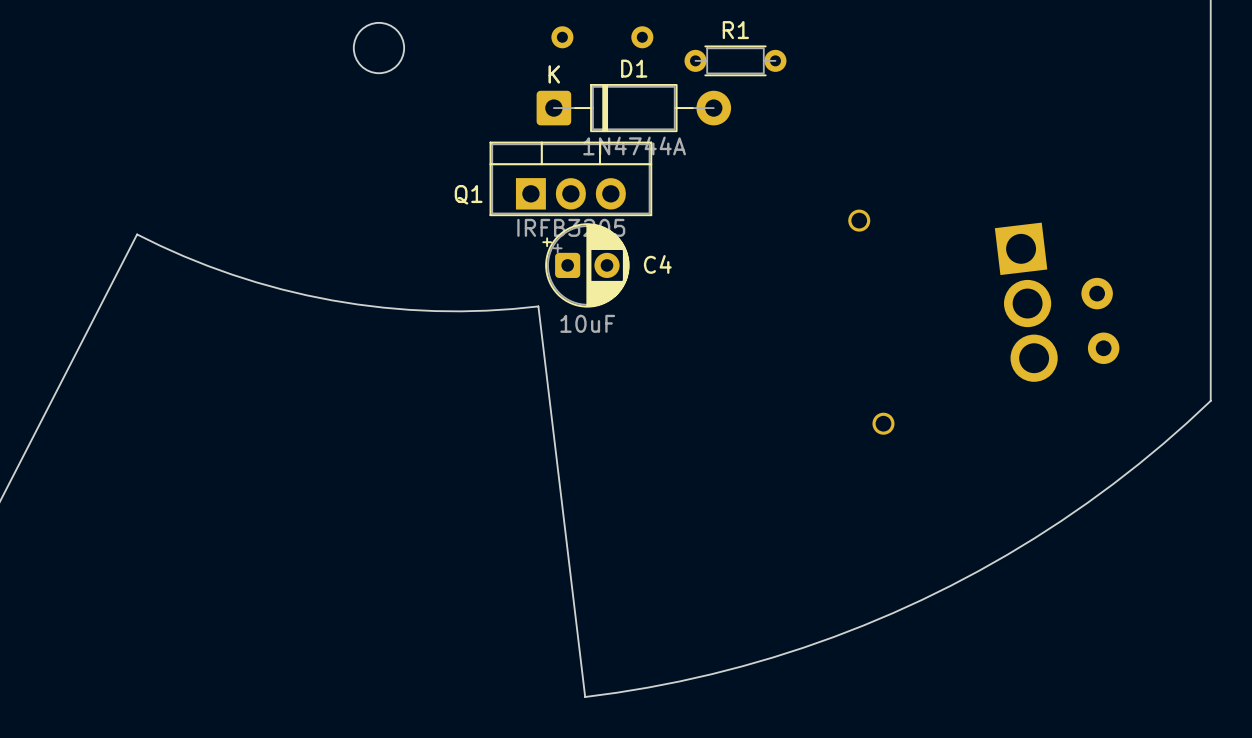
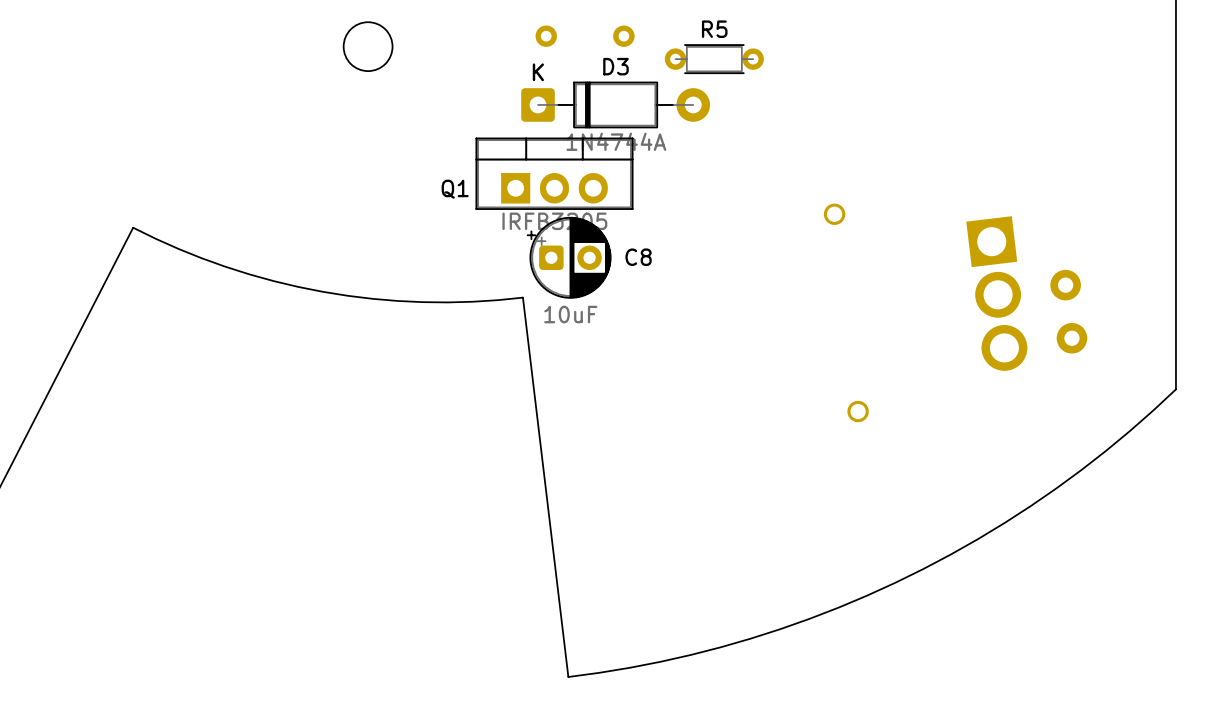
R1 name: R1 (735, 30) -> R5 (714, 29)
D1 name: D1 (634, 68) -> D3 (615, 66)
C4 name: C4 (657, 264) -> C8 (638, 257)

